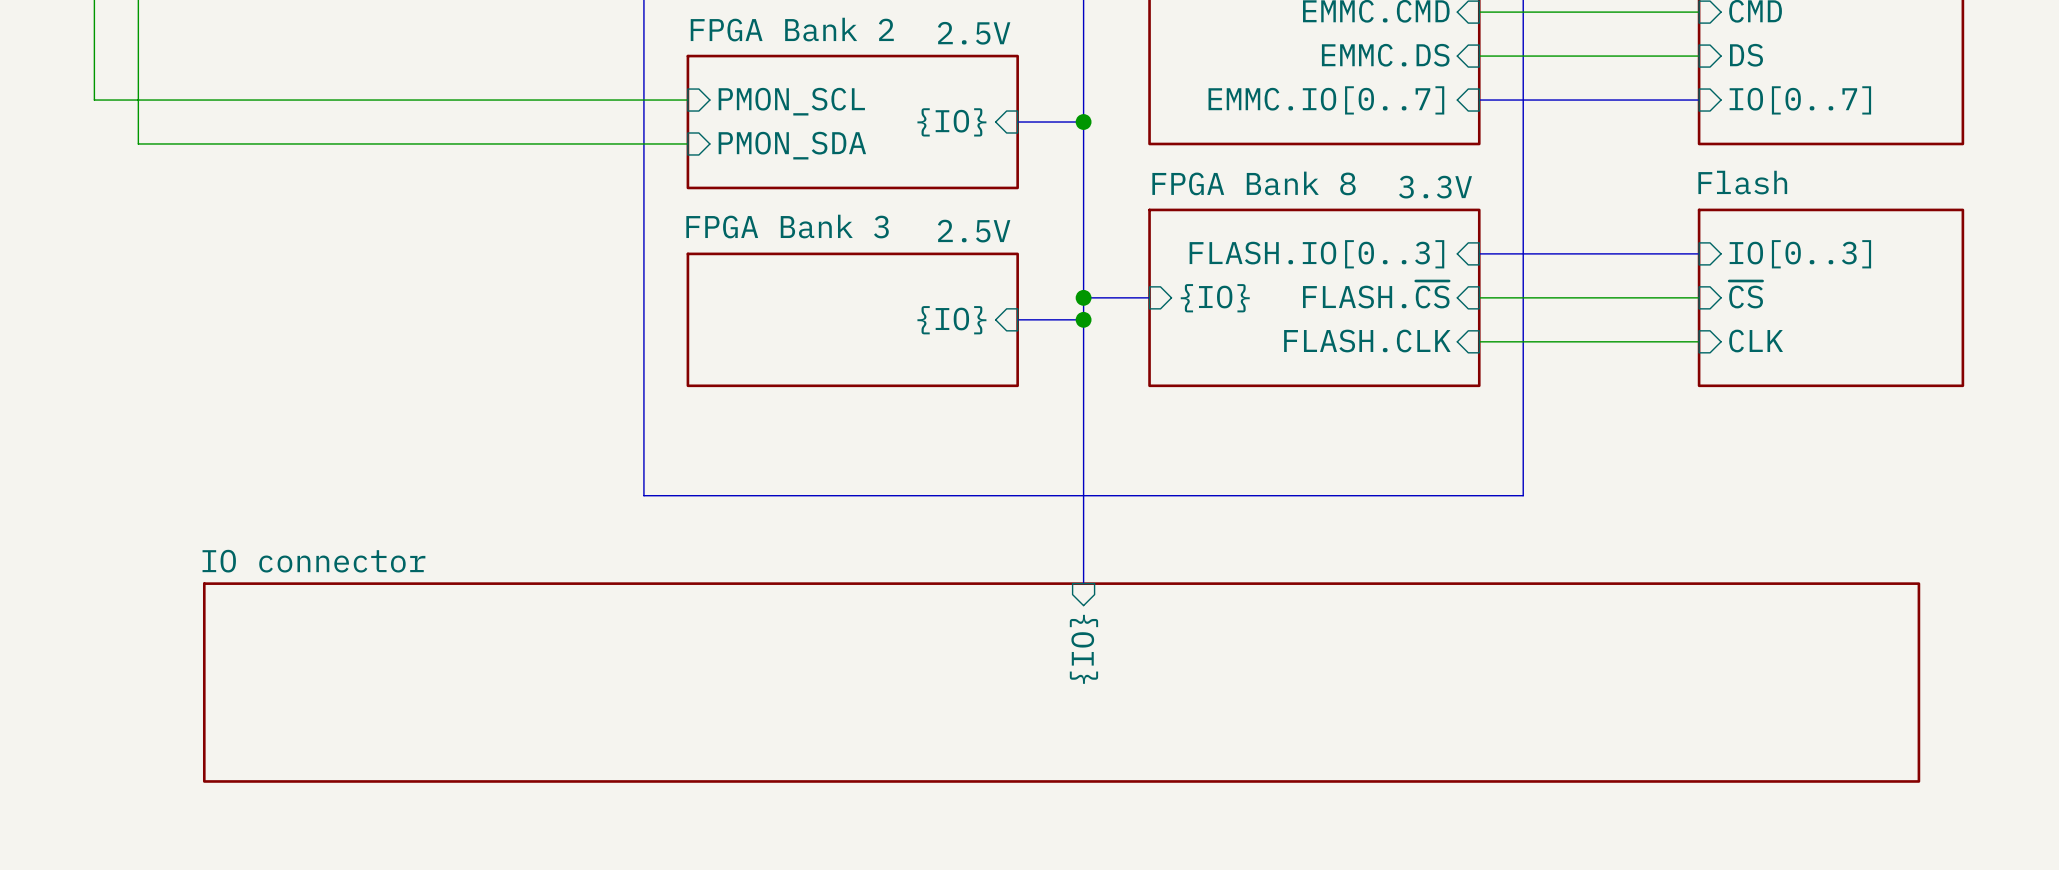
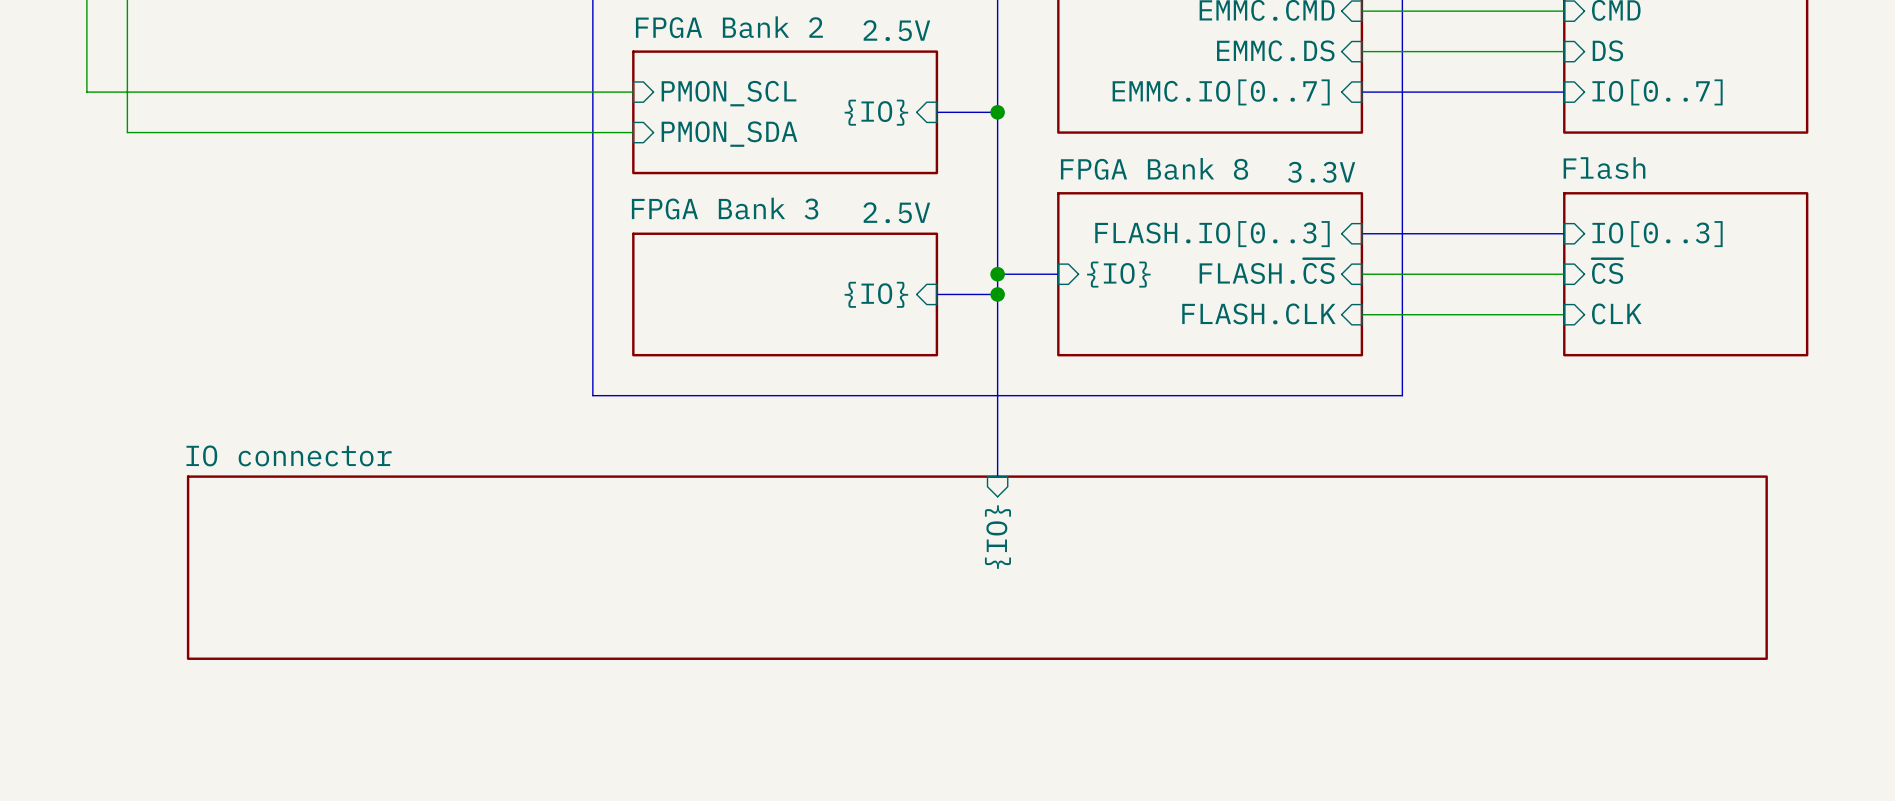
line: (643, 429) (643, 495) (1523, 495) (1523, 429) -> (592, 395) (1402, 395)
bus: (1083, 517) (1083, 583) -> none
sheet pin position: {IO} (1083, 649) -> {IO} (997, 537)
sheet IO connector position: (1061, 682) -> (977, 567)

